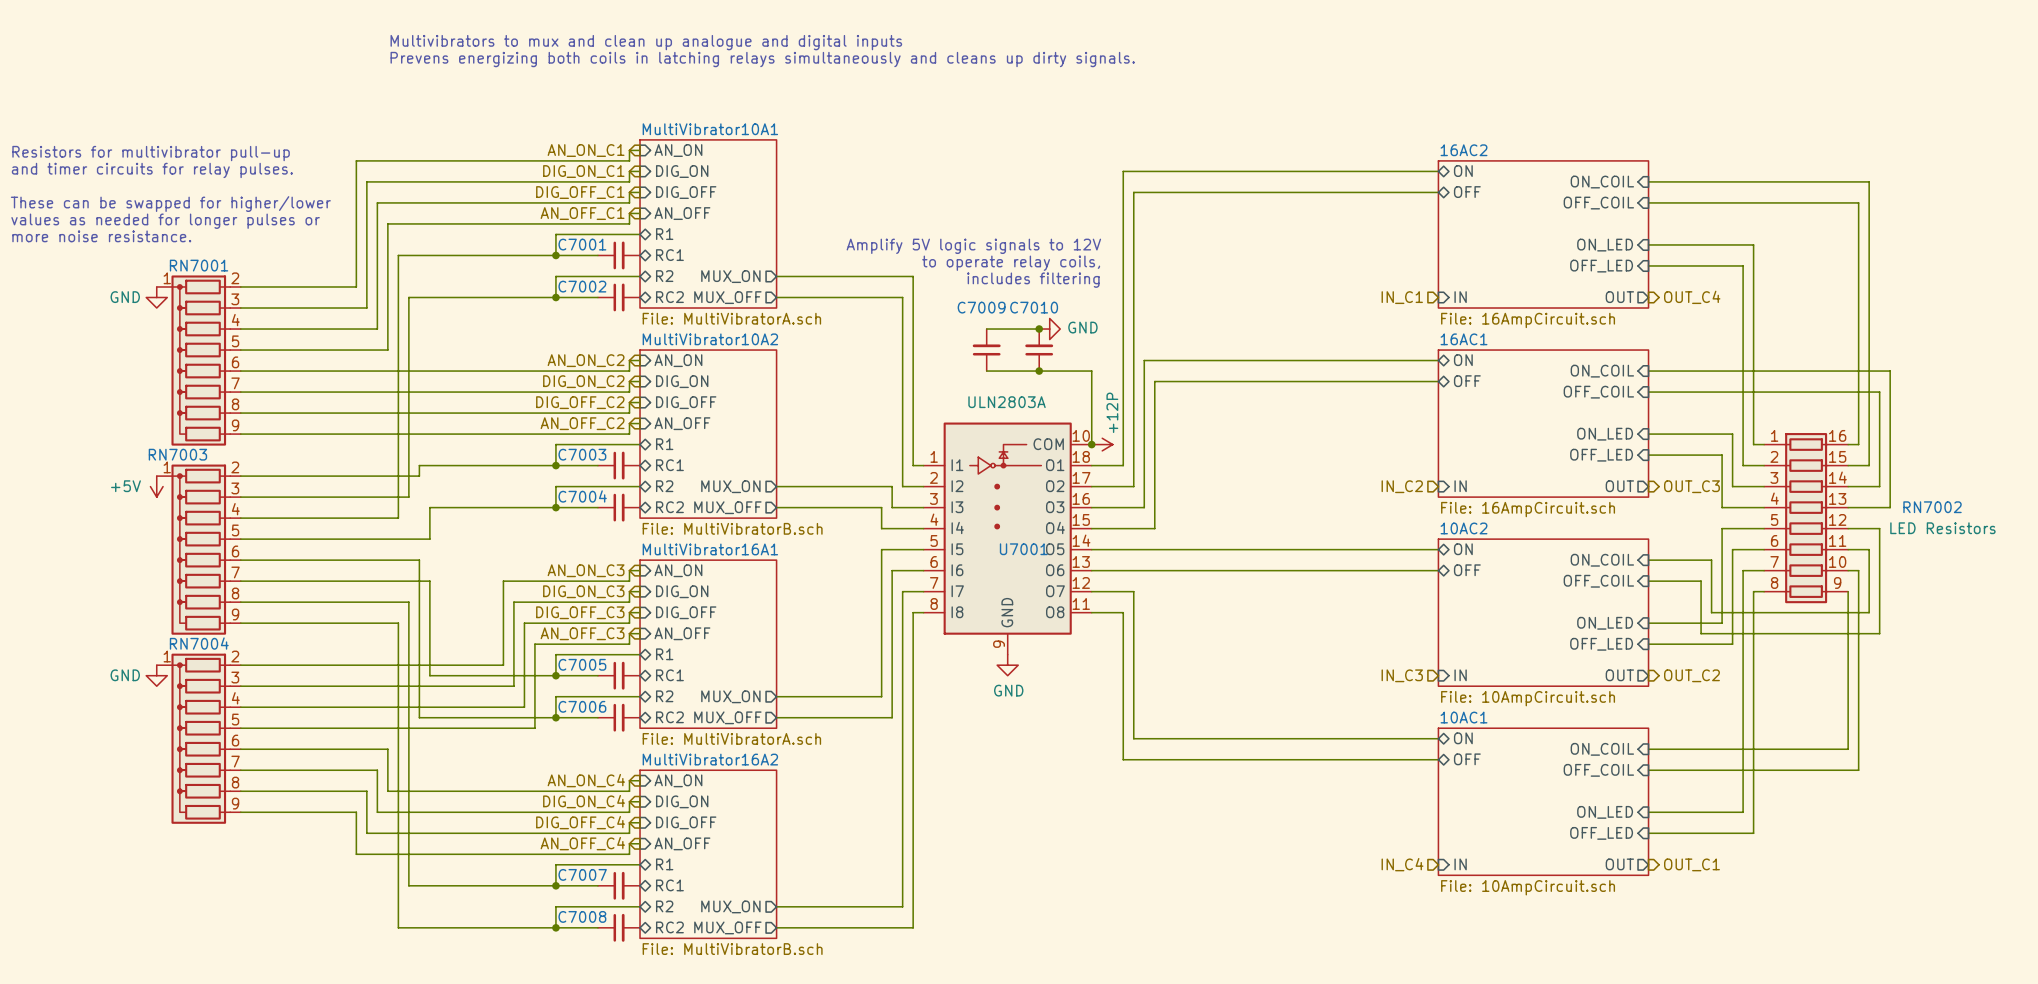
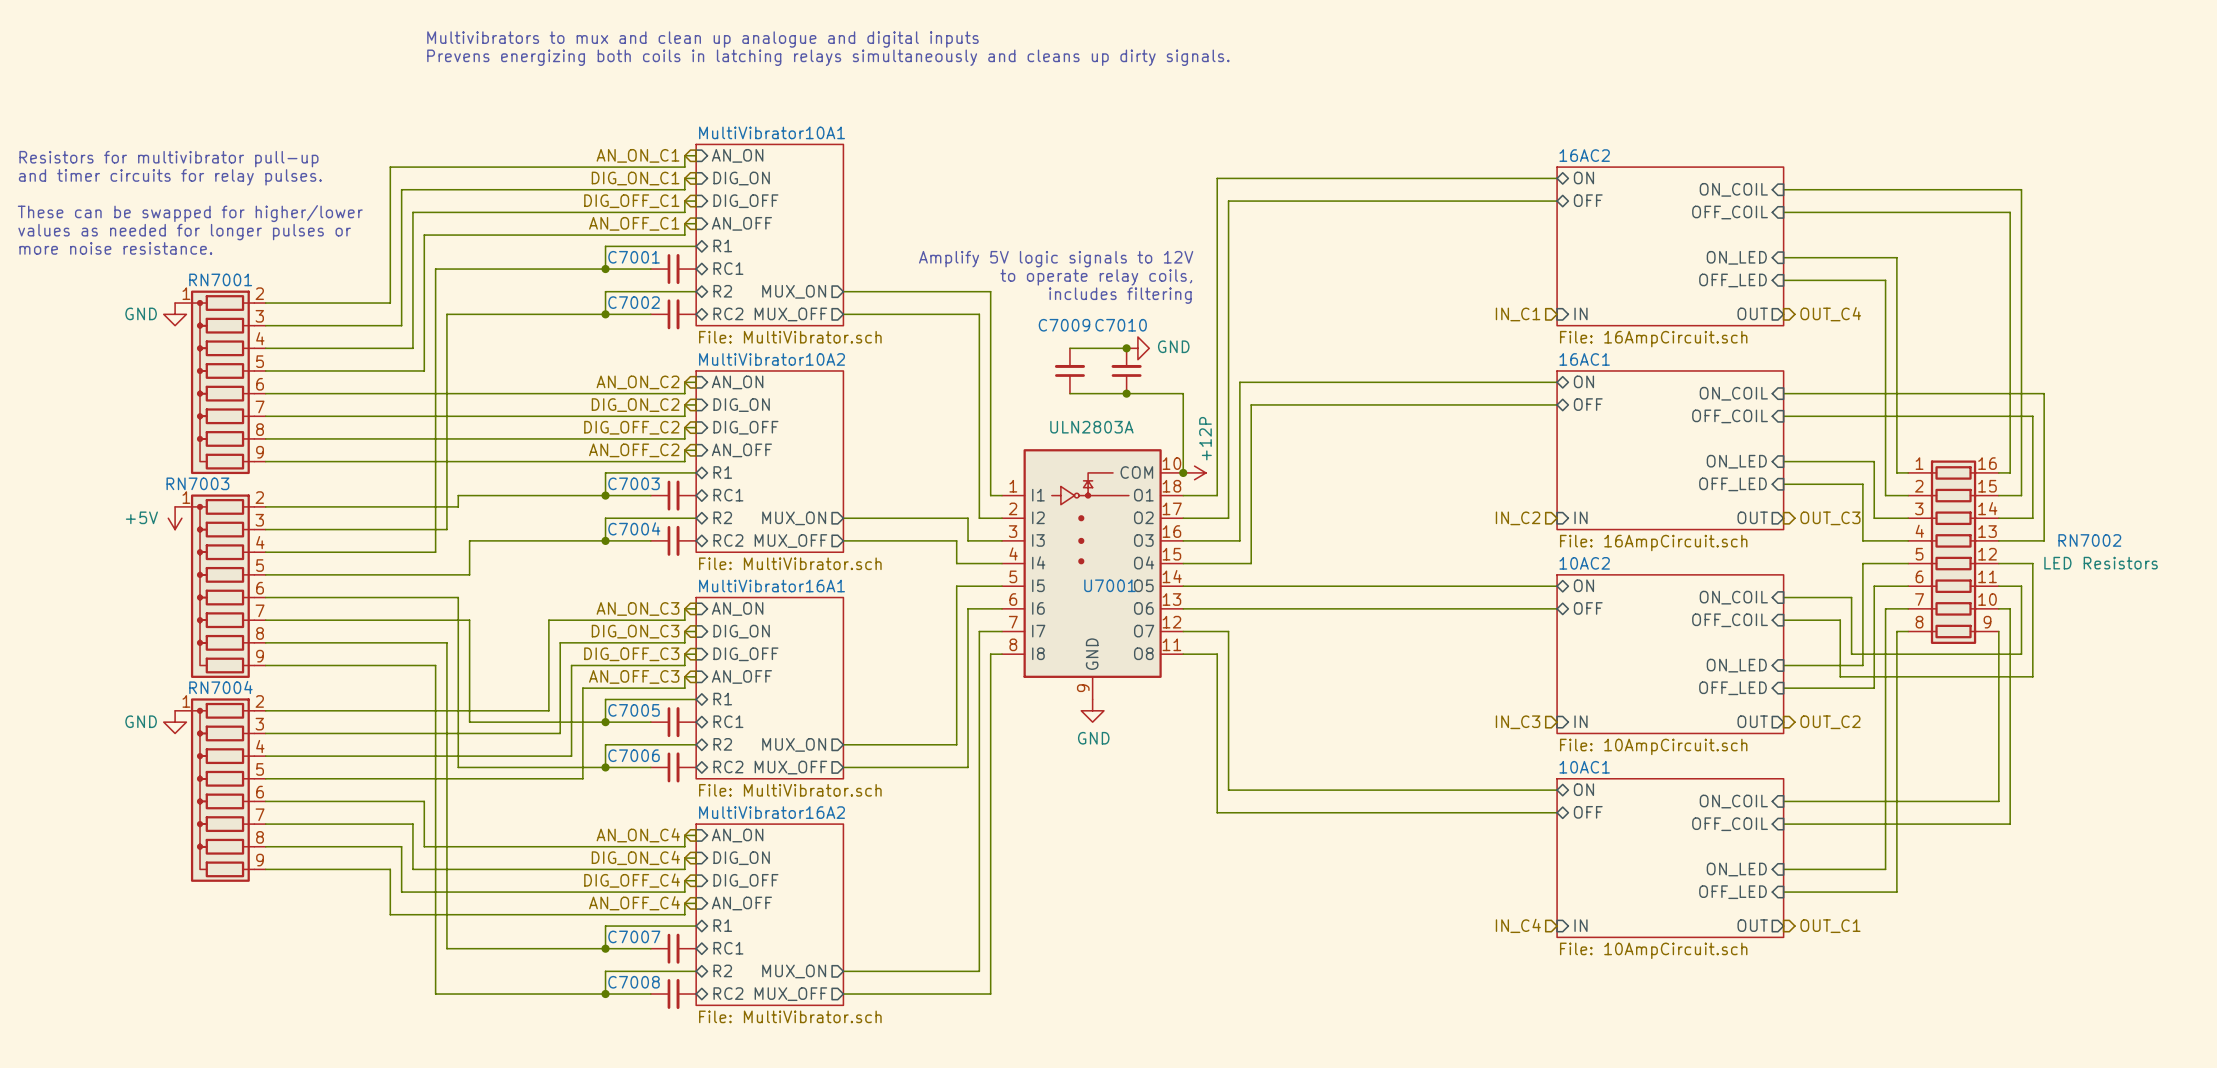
sheet MultiVibrator10A1 value: File: MultiVibratorA.sch (731, 318) -> File: MultiVibrator.sch (790, 337)
sheet MultiVibrator10A2 value: File: MultiVibratorB.sch (732, 528) -> File: MultiVibrator.sch (790, 563)
sheet MultiVibrator16A1 value: File: MultiVibratorA.sch (731, 738) -> File: MultiVibrator.sch (790, 790)
sheet MultiVibrator16A2 value: File: MultiVibratorB.sch (732, 949) -> File: MultiVibrator.sch (790, 1016)

